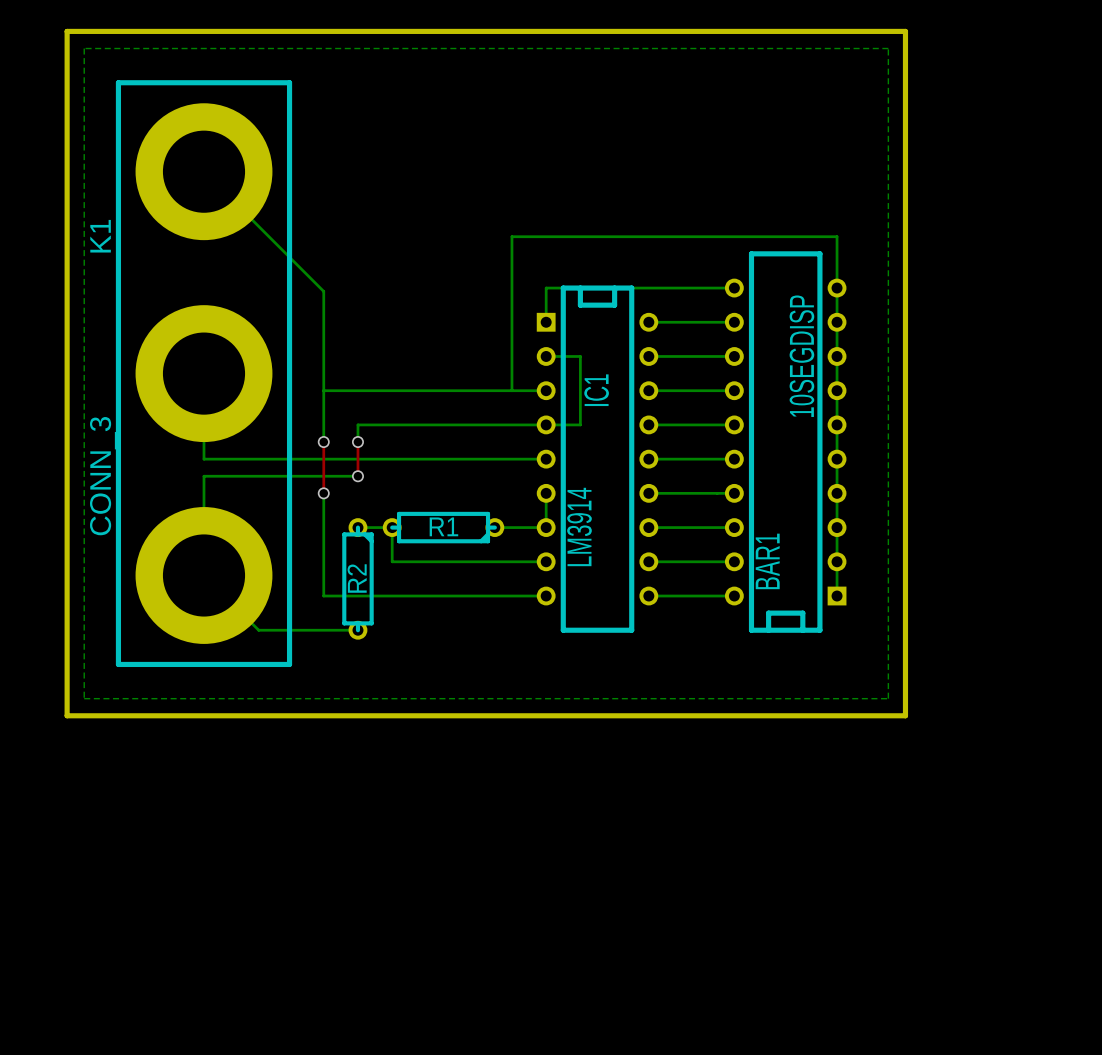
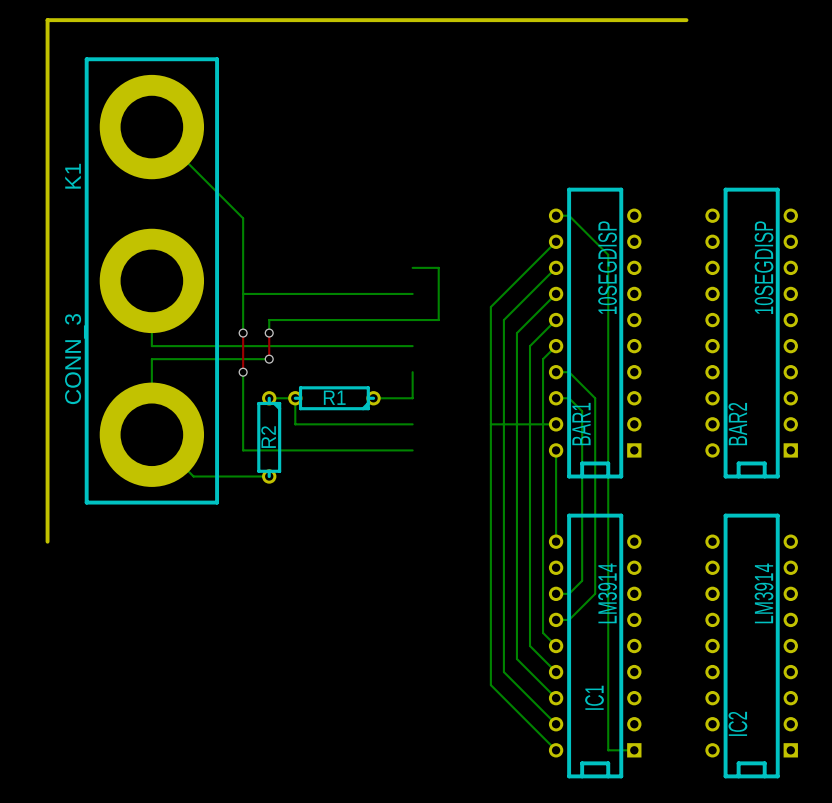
board edge: (905, 31) (905, 715) (67, 715) -> none
bottom zone outline: (84, 48) (888, 48) (888, 698) (84, 698) (84, 48) -> none
bottom track: (734, 288) (546, 288) (546, 322) -> (556, 215) (569, 215) (608, 254) (608, 750) (634, 750)
bottom track: (648, 322) (734, 322) -> (556, 750) (490, 685) (490, 306) (556, 241)
bottom track: (648, 356) (734, 356) -> (556, 724) (503, 672) (503, 320) (556, 267)
bottom track: (511, 390) (511, 236) (837, 236) (837, 596) -> none
bottom track: (648, 390) (734, 390) -> (556, 698) (516, 659) (516, 333) (556, 293)
bottom track: (648, 424) (734, 424) -> (556, 672) (530, 646) (530, 346) (556, 320)
BAR2: none -> 10SEGDISP (751, 333)
IC1 rotation: 0° (597, 459) -> 180° (595, 646)
IC1 position: (597, 459) -> (595, 646)
bottom track: (648, 459) (734, 459) -> (556, 646) (543, 632) (543, 359) (556, 346)
bottom track: (648, 493) (734, 493) -> (556, 619) (569, 619) (595, 593) (595, 398) (569, 372) (556, 372)
bottom track: (648, 527) (734, 527) -> (556, 593) (569, 593) (582, 580) (582, 411) (569, 398) (556, 398)
bottom track: (648, 596) (734, 596) -> (556, 541) (556, 450)
IC2: none -> LM3914 (751, 646)

